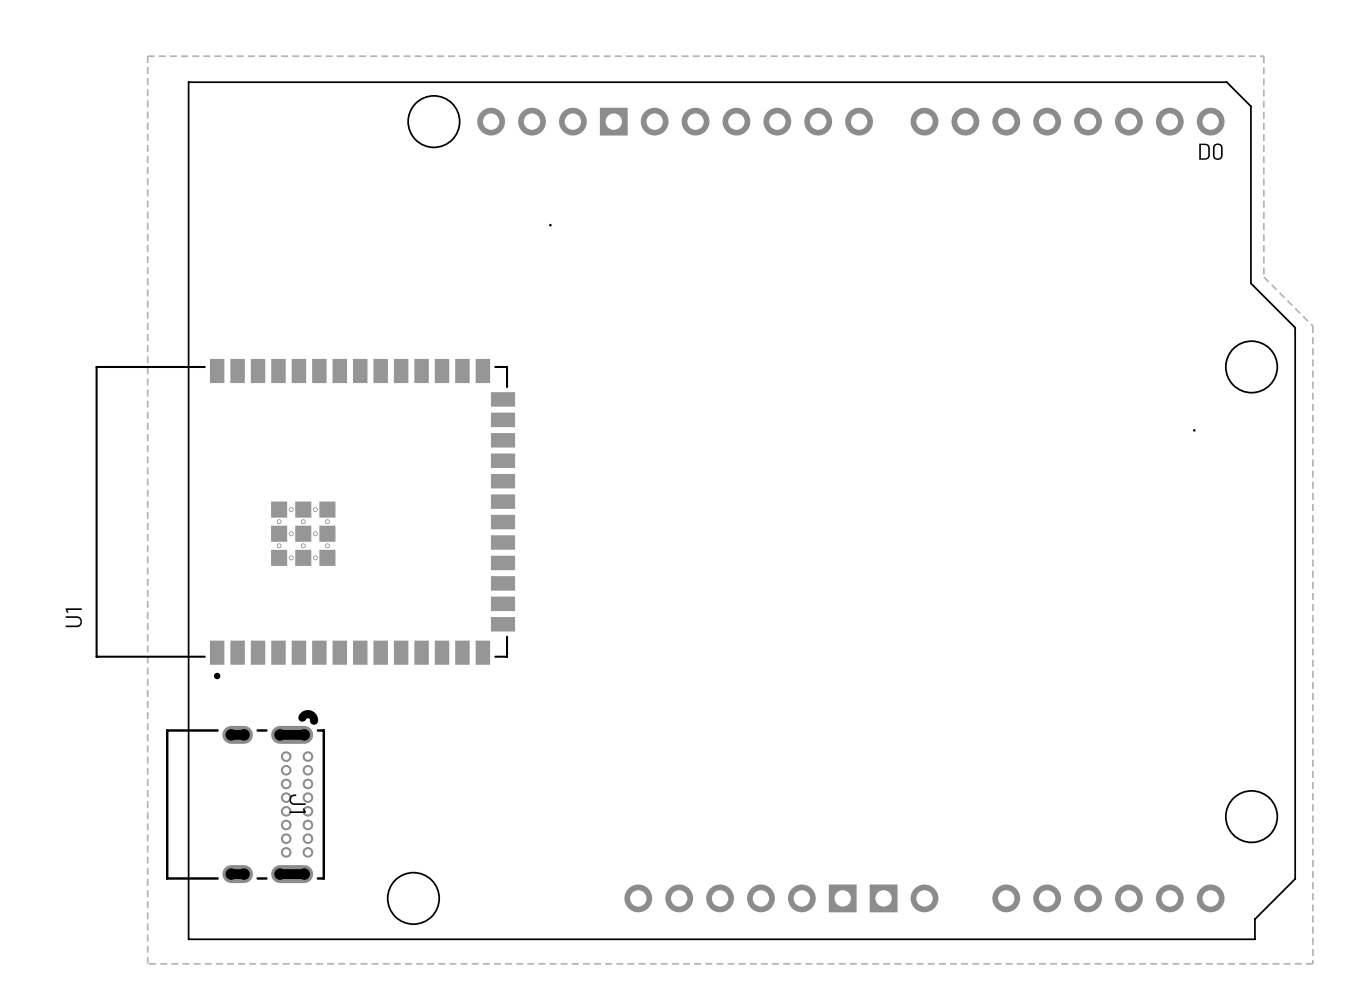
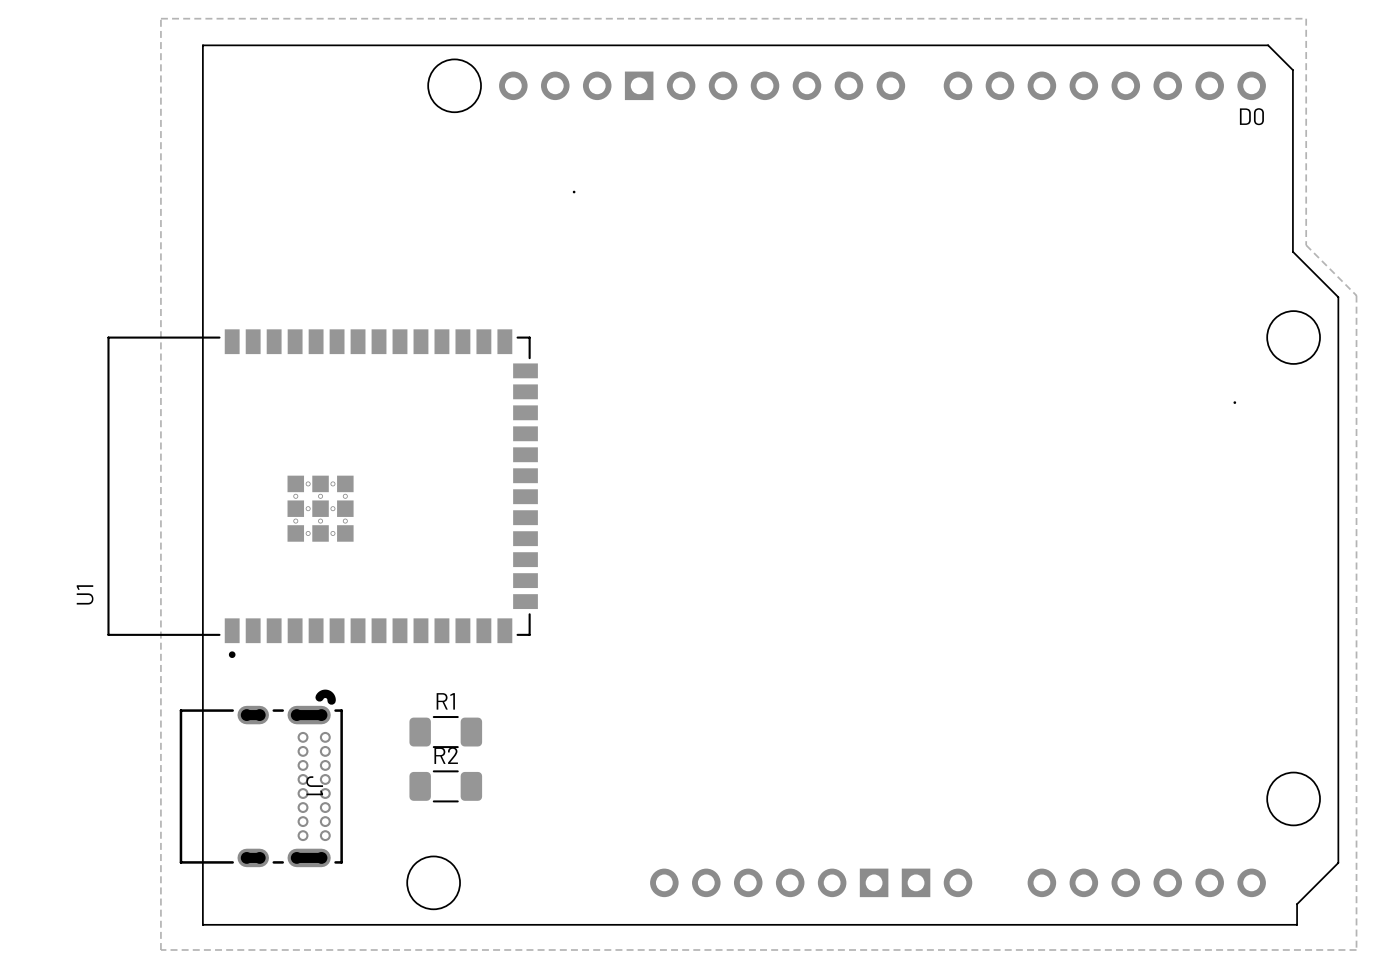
R1: none -> (445, 732)
R2: none -> (445, 786)

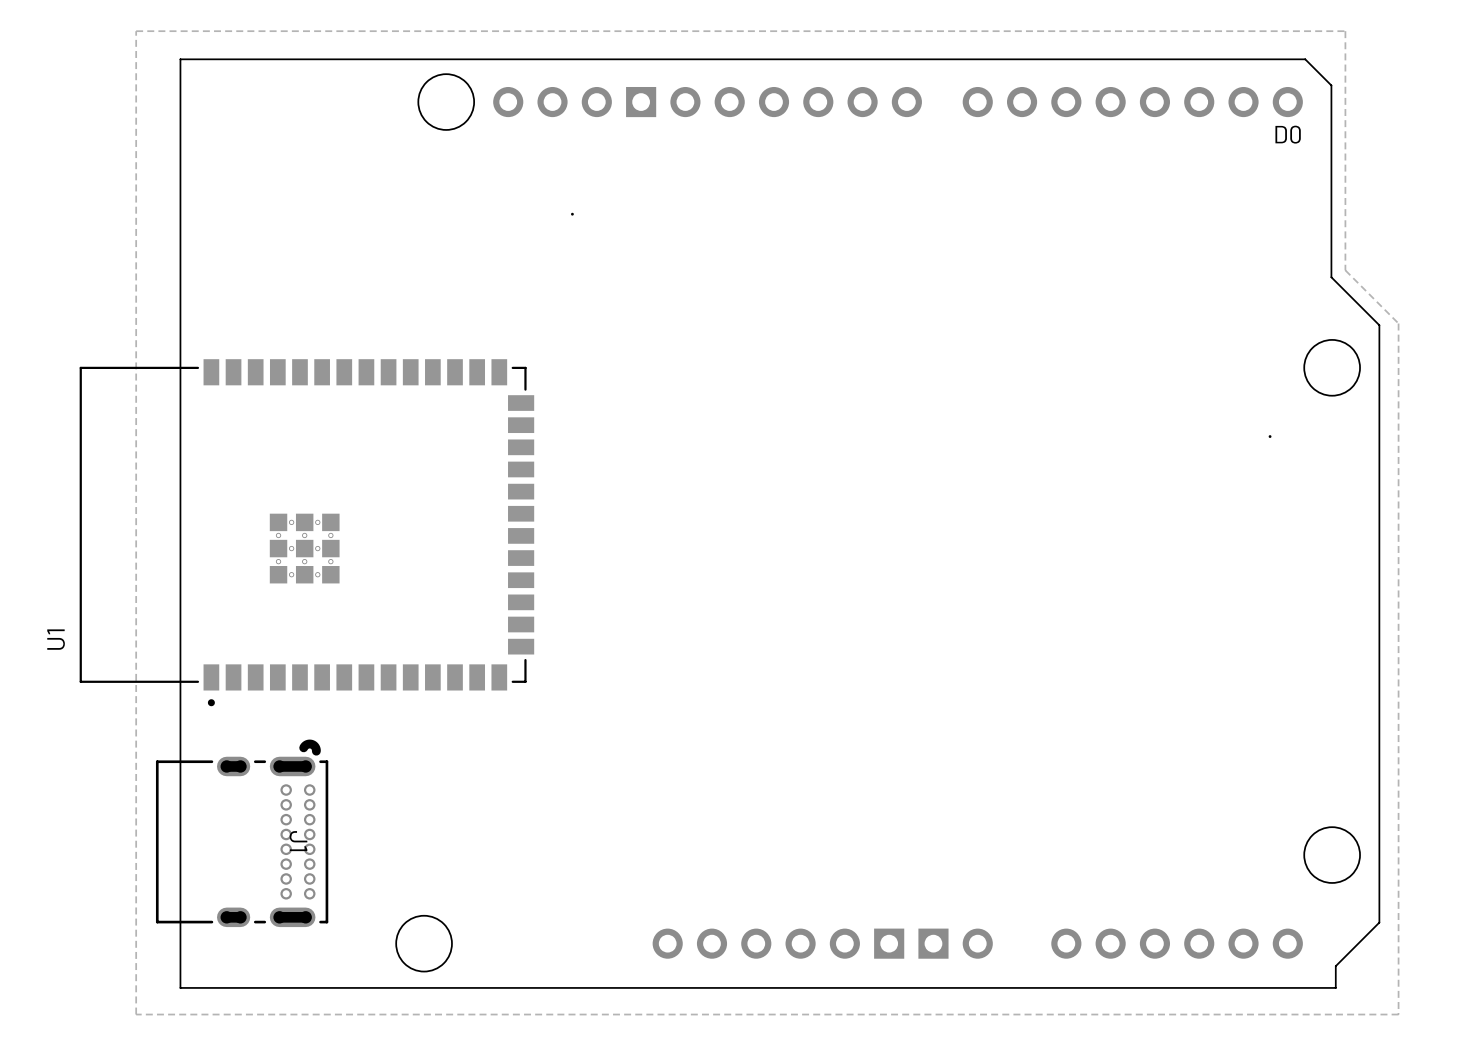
R1: (445, 732) -> none
R2: (445, 786) -> none

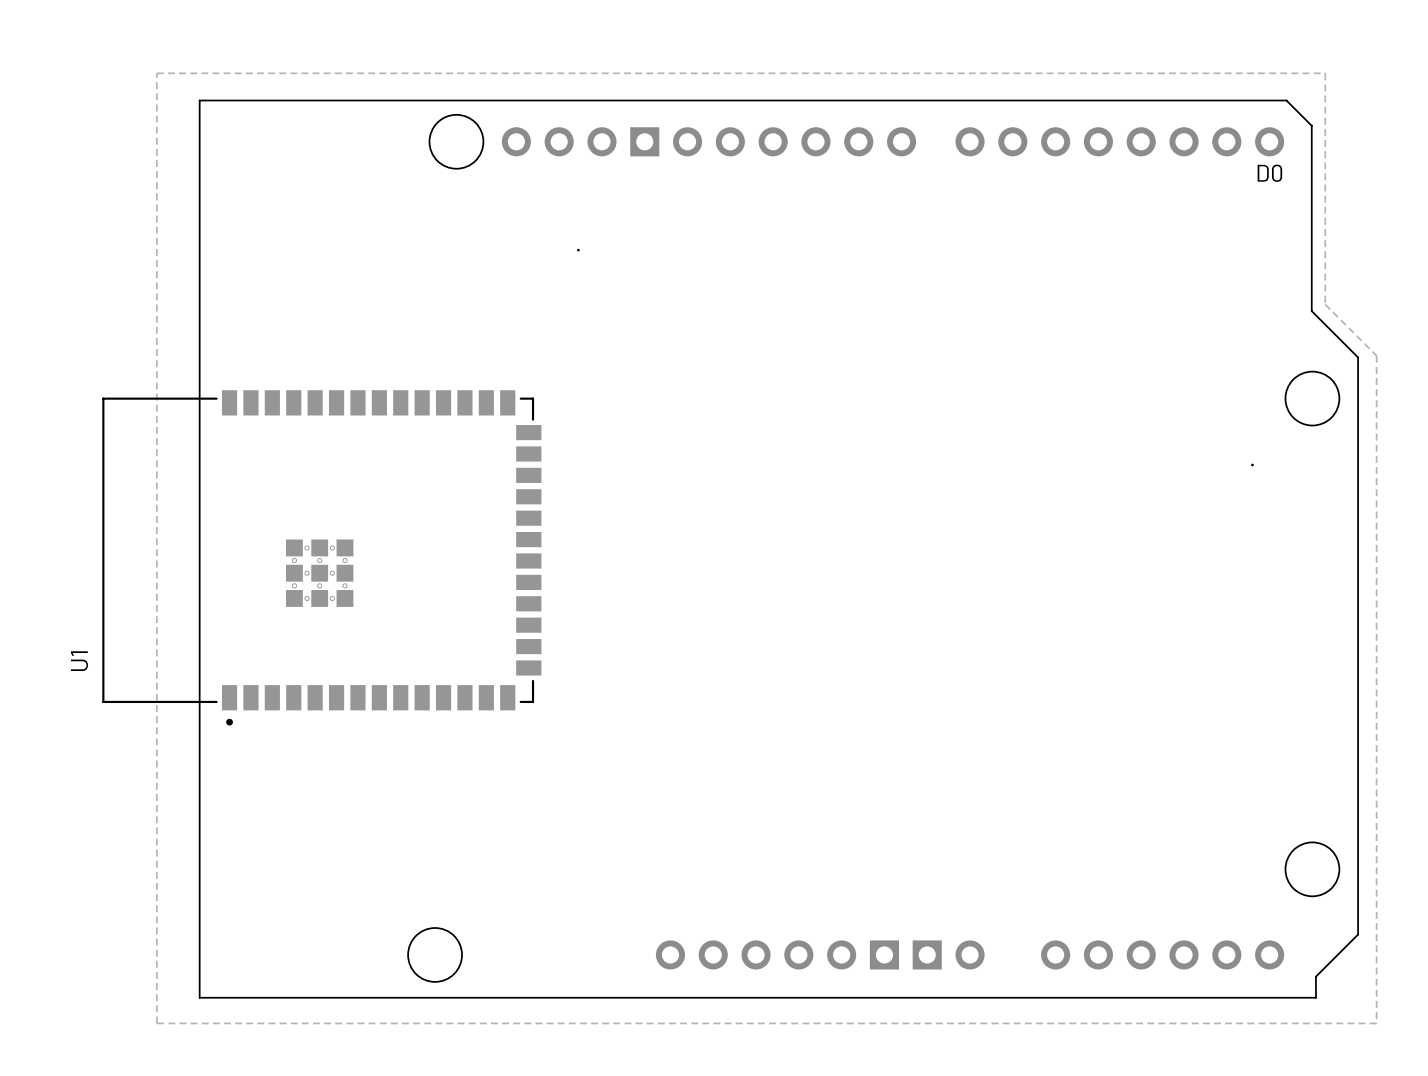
J1: (242, 833) -> none

